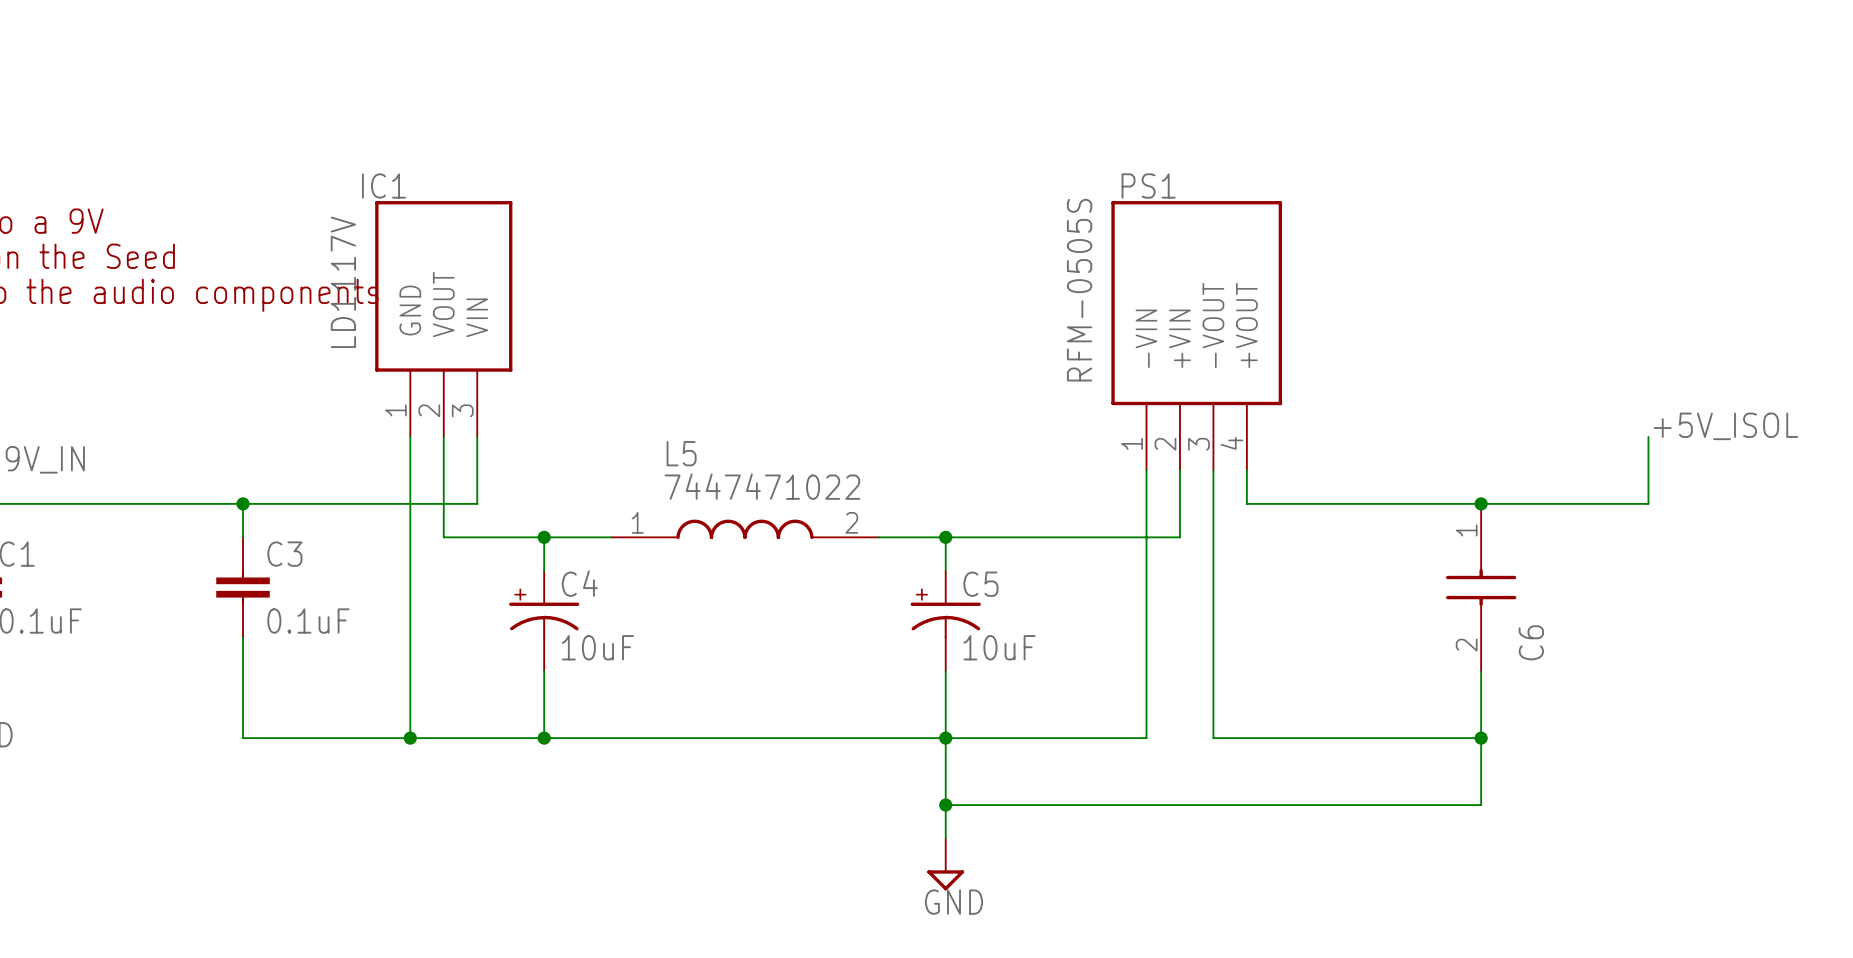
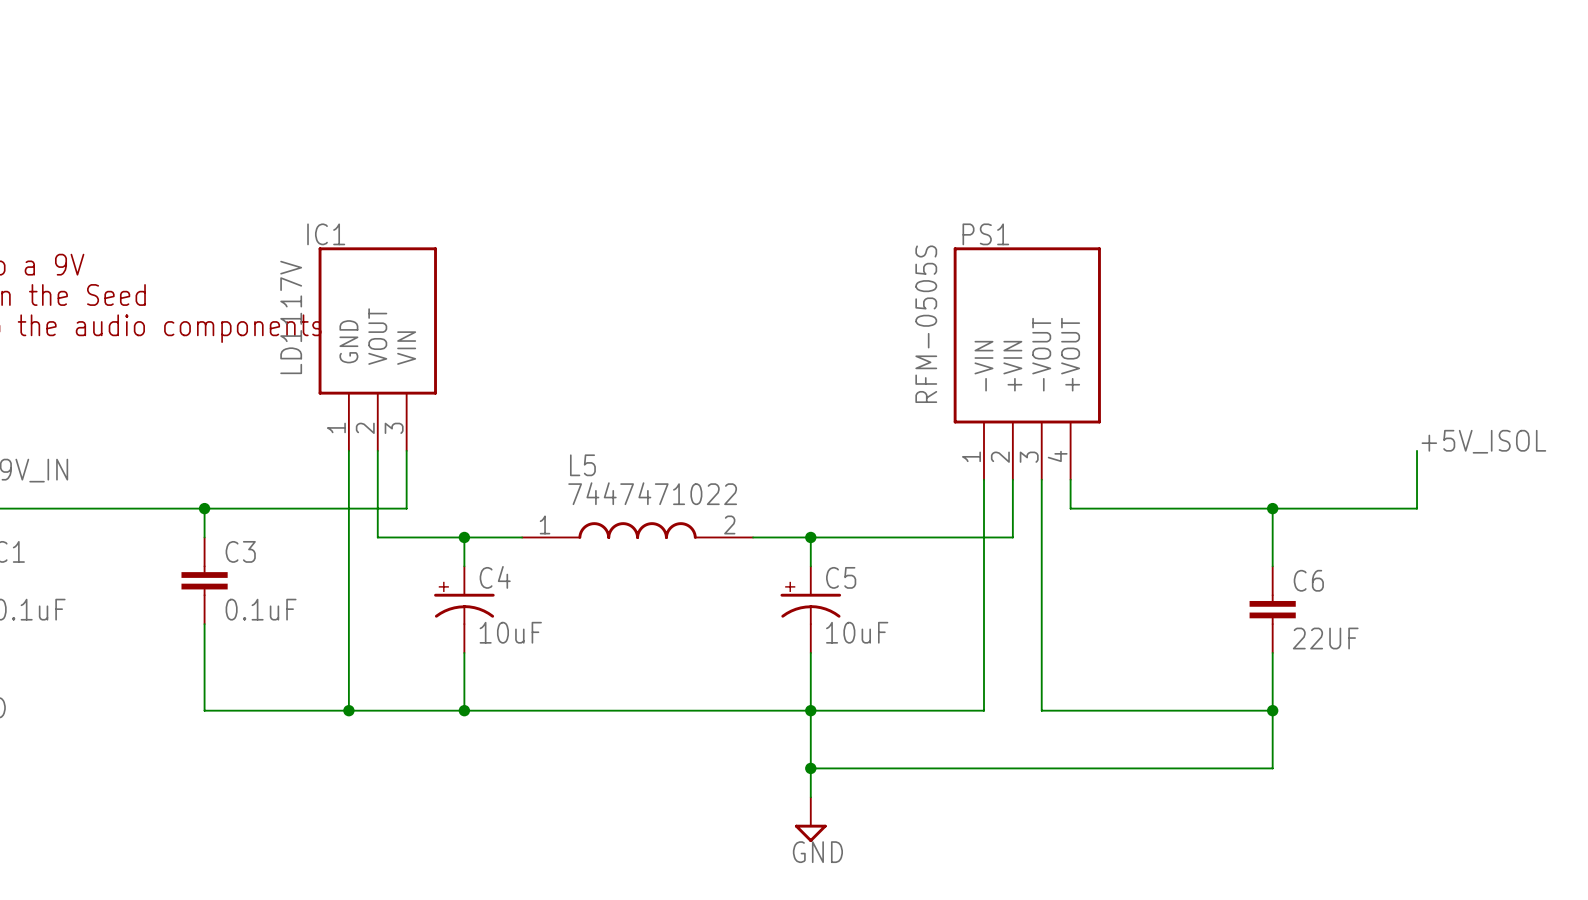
C6 symbol: [1446, 503, 1517, 672] -> [1249, 566, 1296, 653]
C6 name position: C6 (1531, 642) -> C6 (1308, 580)
C6 value: none -> 22UF (1325, 638)

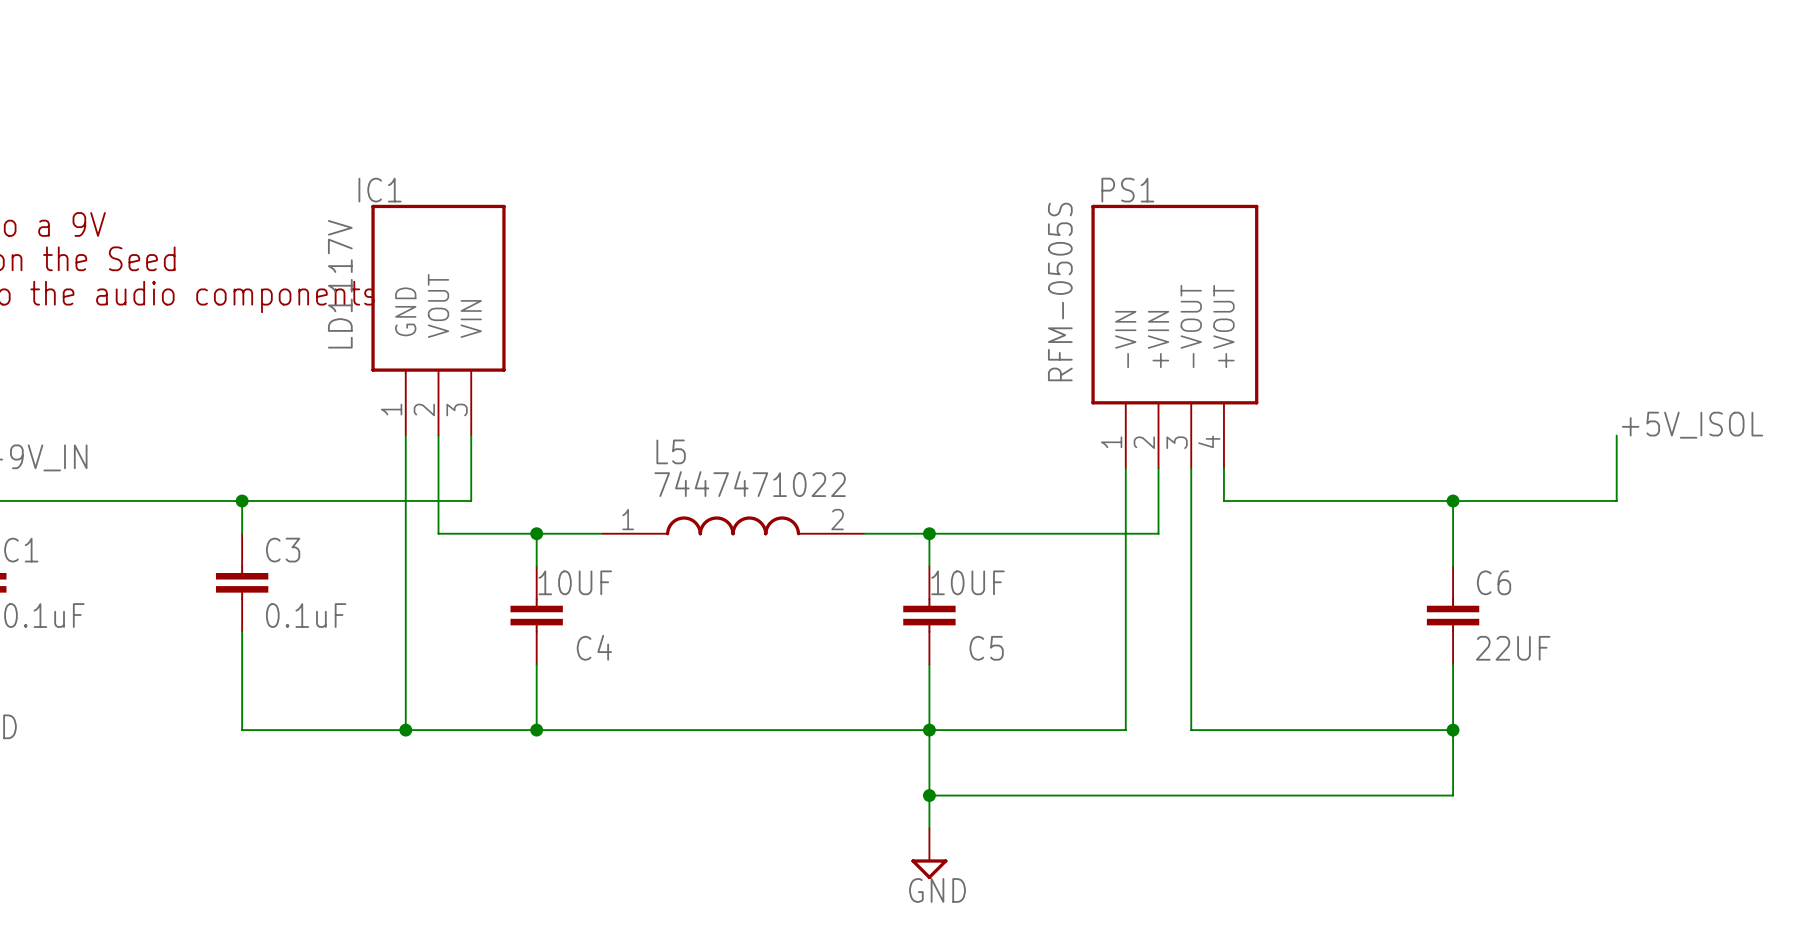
C4 symbol: [434, 566, 495, 653] -> [510, 566, 563, 665]
C5 symbol: [780, 566, 842, 653] -> [903, 566, 956, 665]
C4 name position: C4 (495, 577) -> C4 (594, 647)
C5 name position: C5 (841, 577) -> C5 (986, 648)
C4 value: 10uF (510, 632) -> 10UF (575, 582)
C5 value: 10uF (857, 632) -> 10UF (967, 582)

